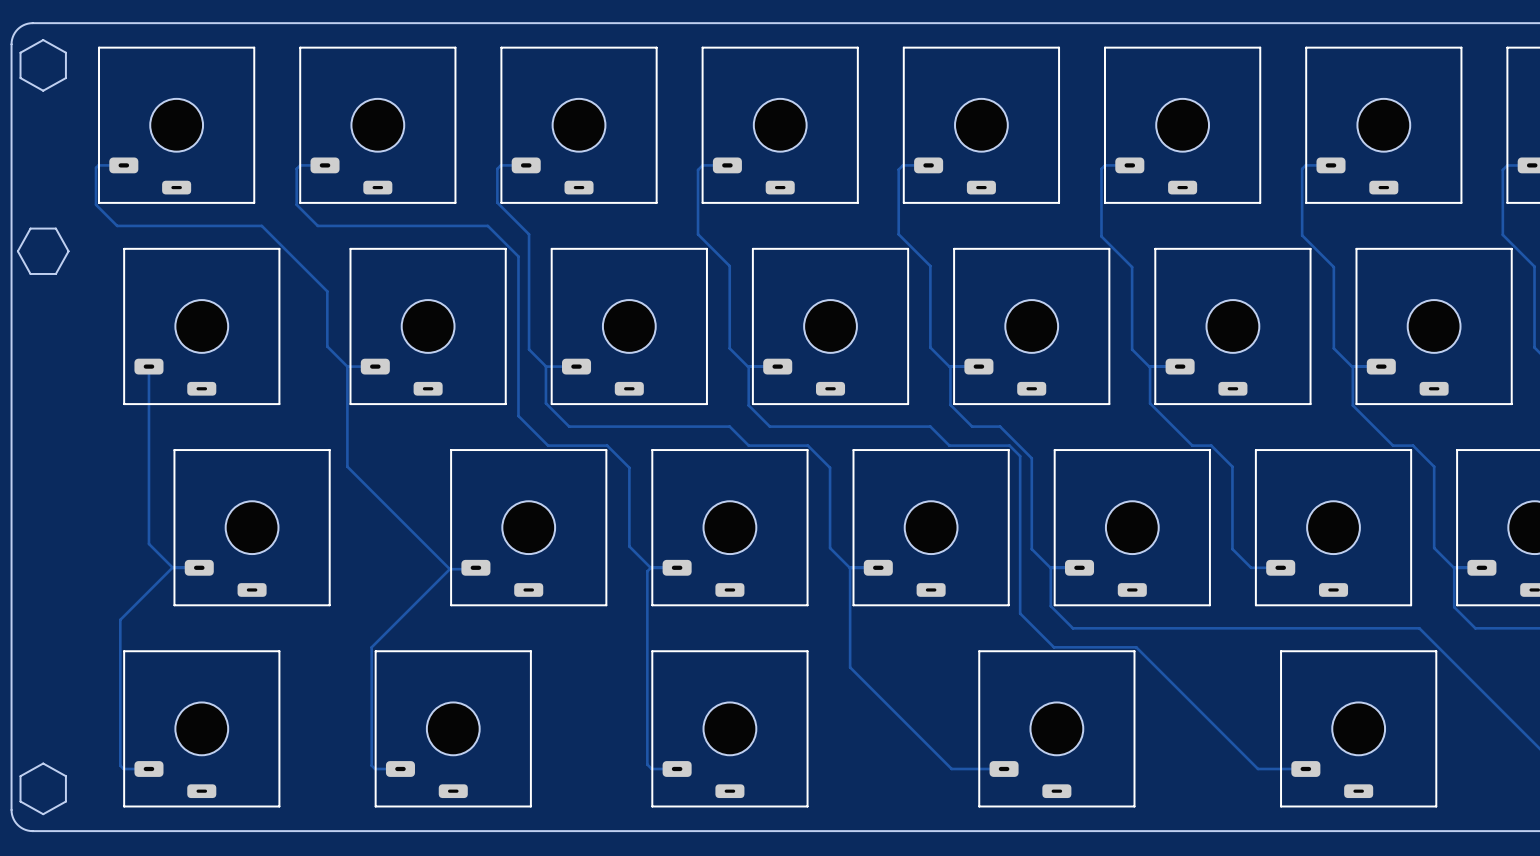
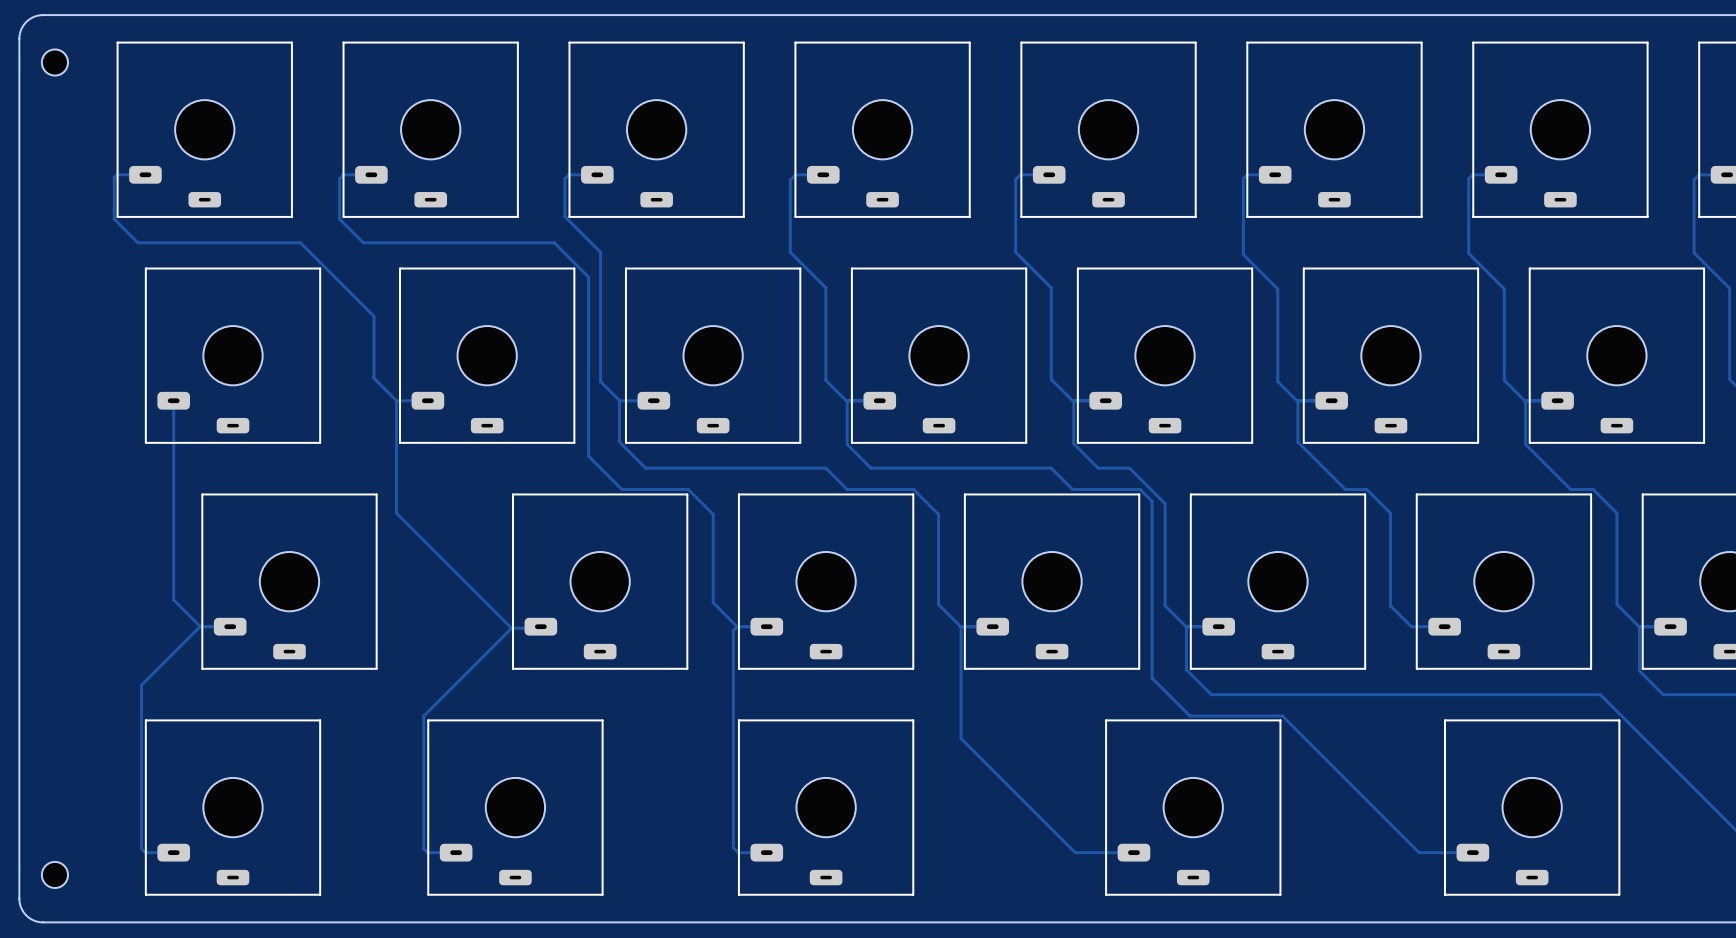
drawing: [19, 39, 67, 92] -> none
part: none -> (54, 62)
drawing: [17, 228, 70, 275] -> none
drawing: [19, 762, 67, 815] -> none
part: none -> (54, 874)

